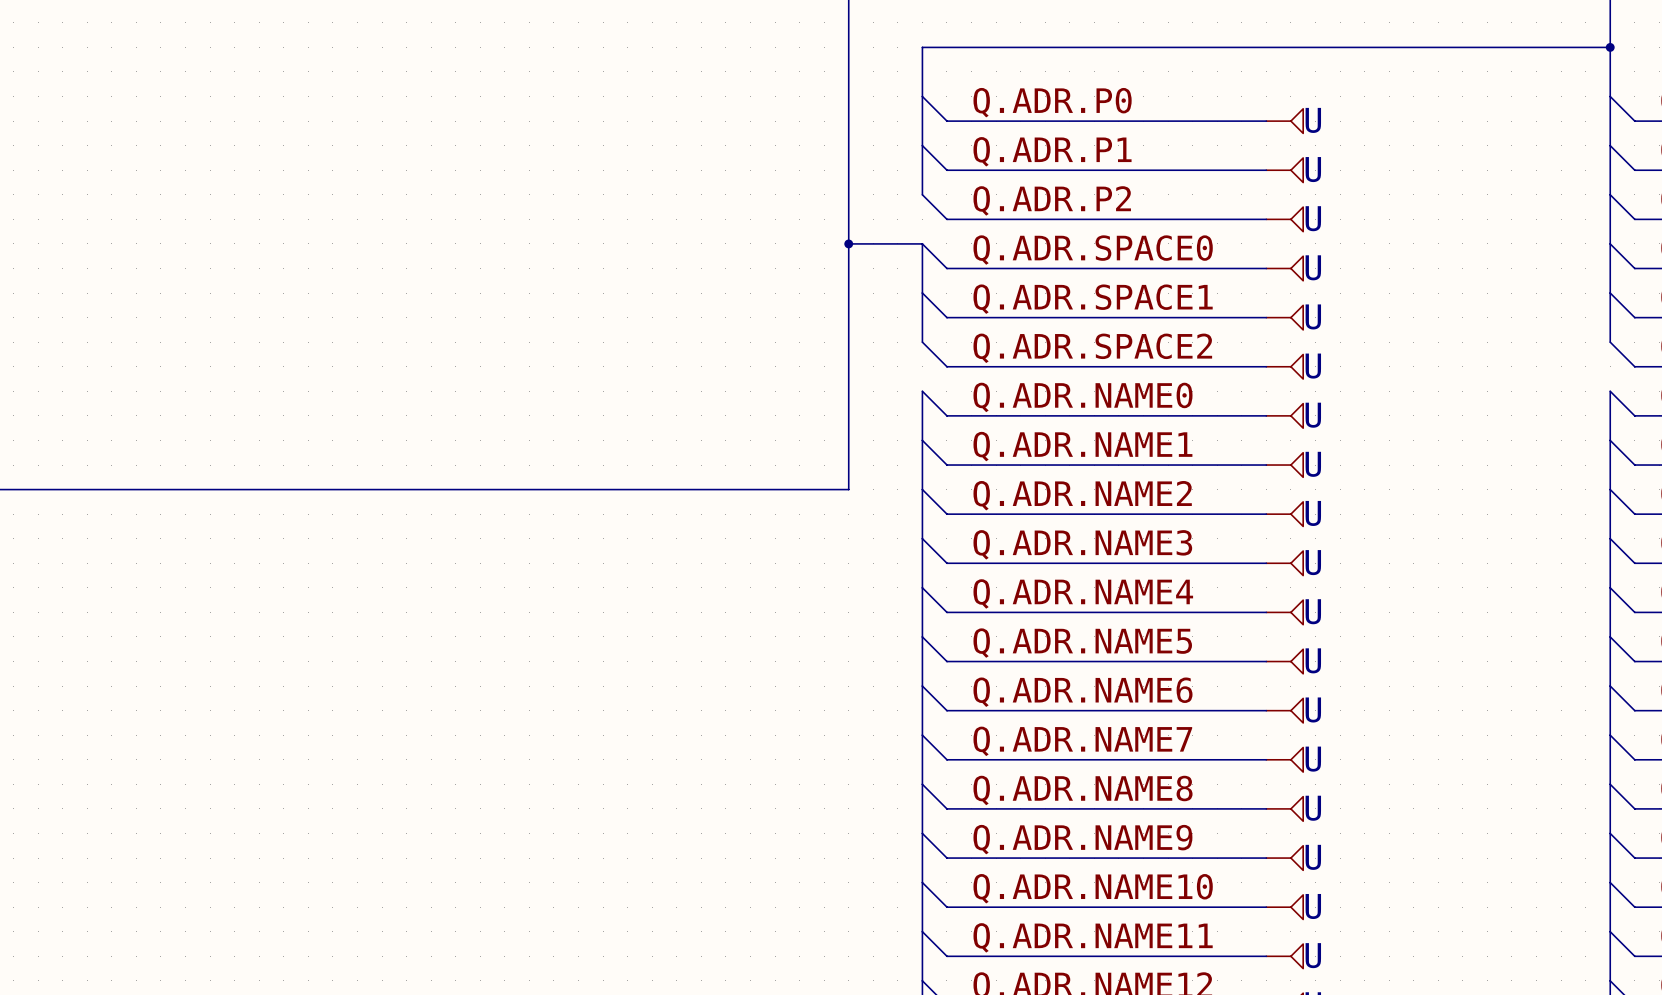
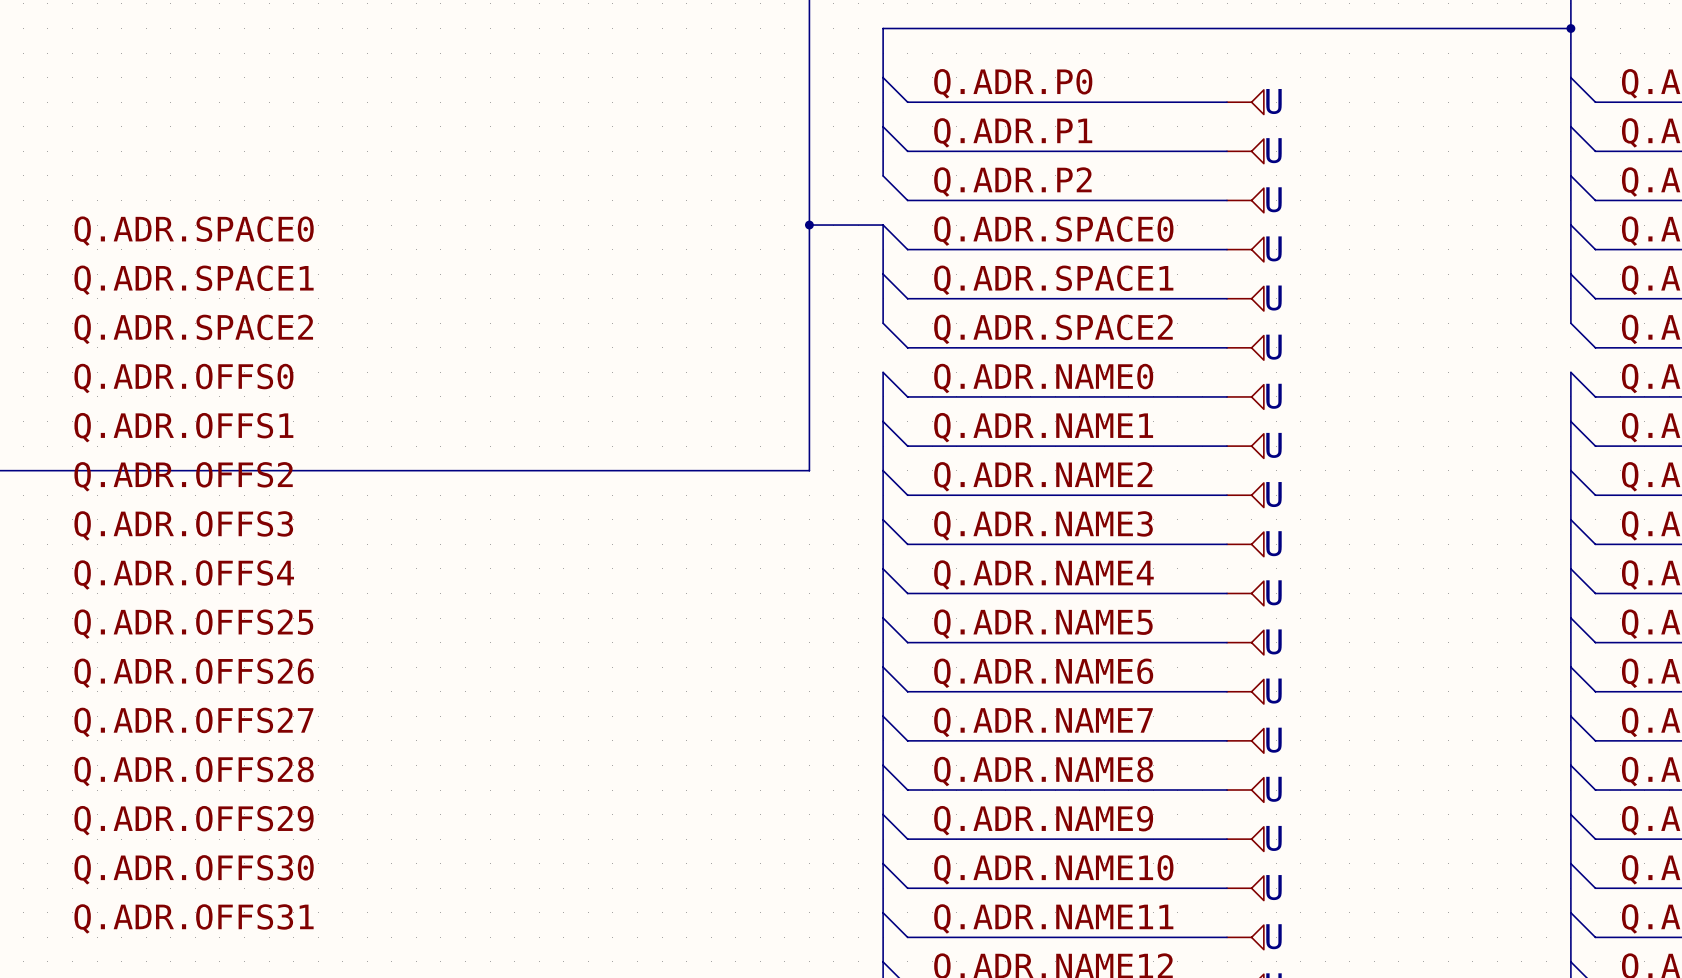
label: none -> Q.ADR.SPACE0 (194, 231)
label: none -> Q.ADR.SPACE1 (194, 280)
label: none -> Q.ADR.SPACE2 (193, 329)
label: none -> Q.ADR.OFFS0 (183, 378)
label: none -> Q.ADR.OFFS1 (183, 427)
label: none -> Q.ADR.OFFS2 (183, 476)
label: none -> Q.ADR.OFFS3 (183, 525)
label: none -> Q.ADR.OFFS4 (184, 575)
label: none -> Q.ADR.OFFS25 (193, 624)
label: none -> Q.ADR.OFFS26 (194, 673)
label: none -> Q.ADR.OFFS27 (193, 722)
label: none -> Q.ADR.OFFS28 (194, 771)
label: none -> Q.ADR.OFFS29 (194, 820)
label: none -> Q.ADR.OFFS30 (194, 869)
label: none -> Q.ADR.OFFS31 (194, 918)

